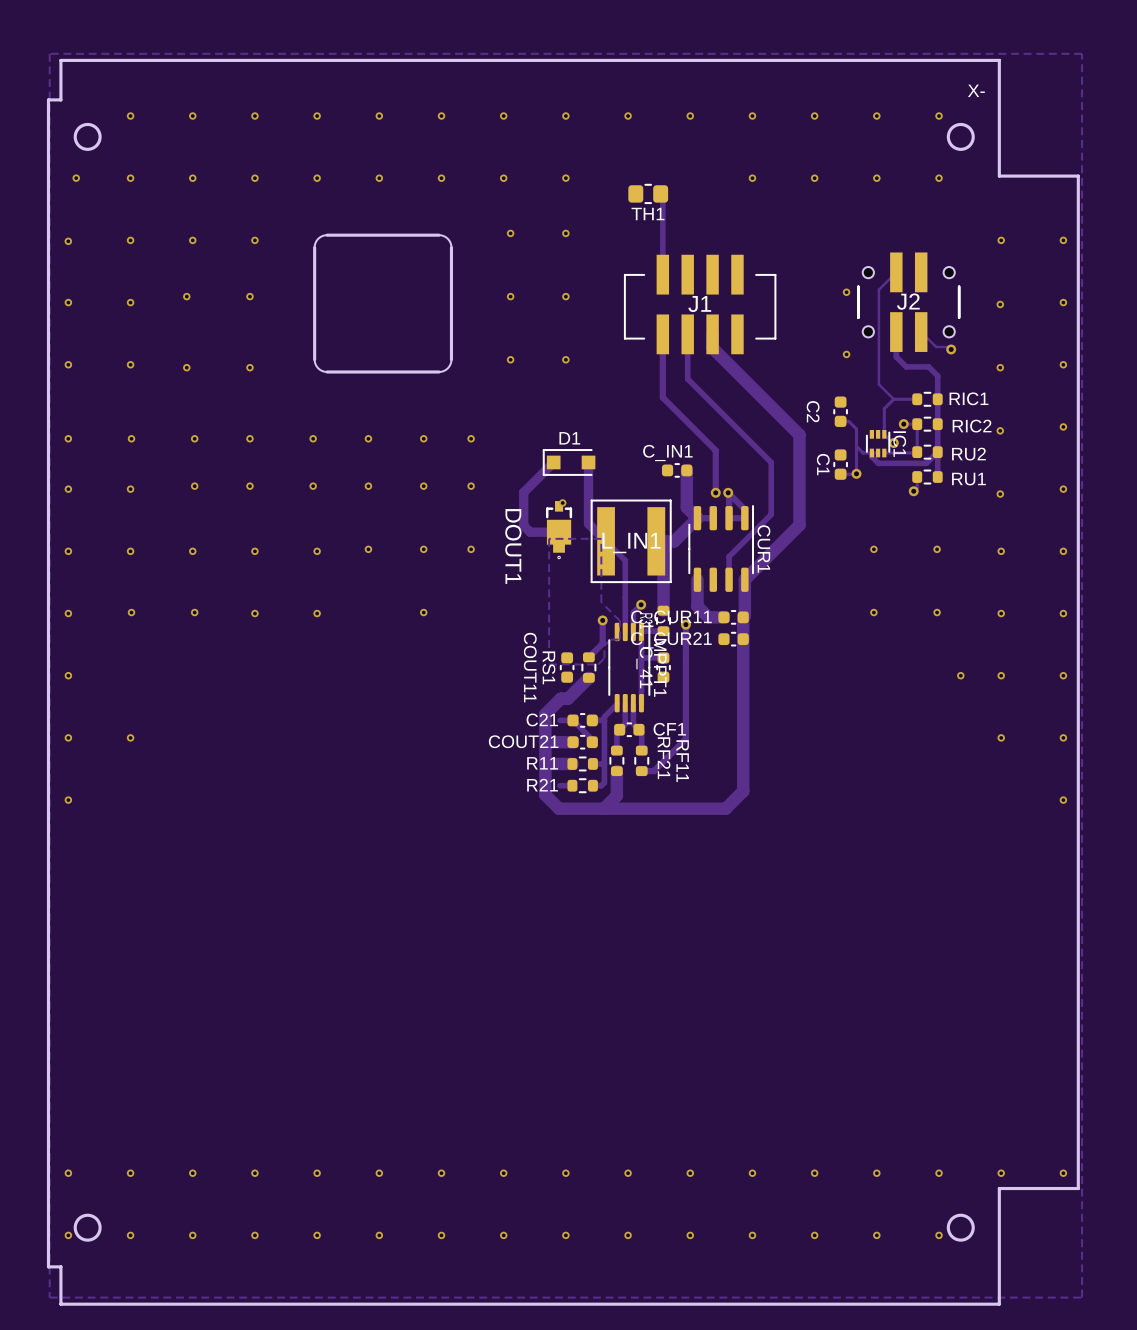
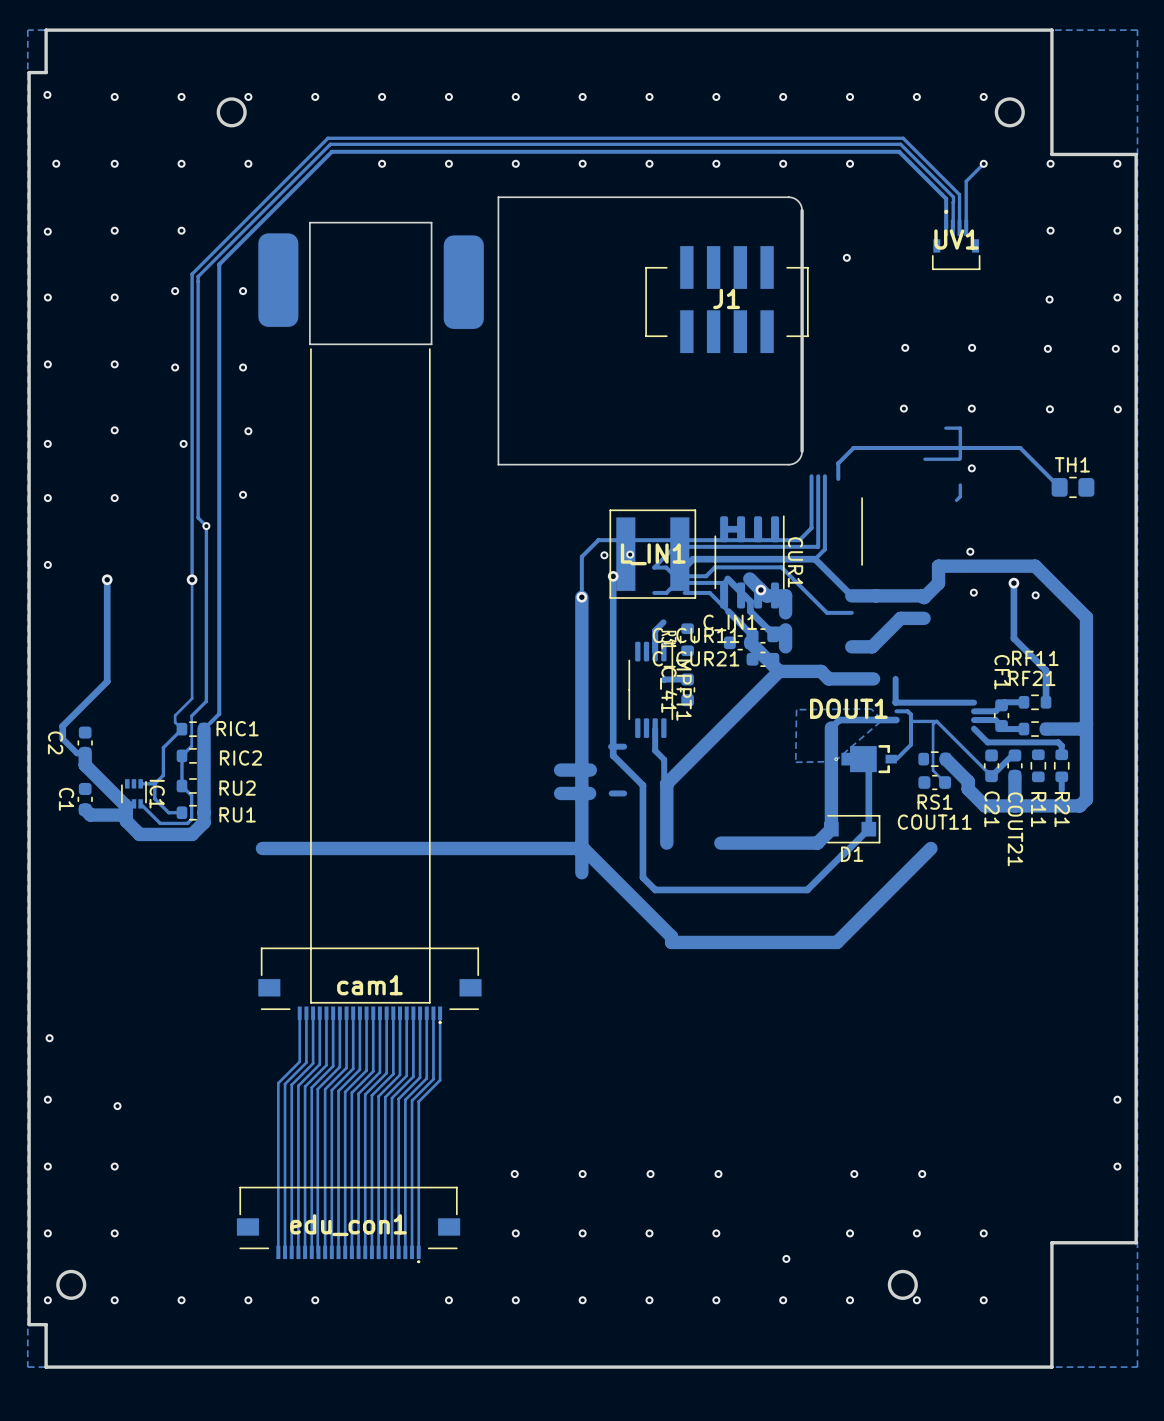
drawing shape: [46, 58, 1080, 1306] -> [27, 28, 1138, 1369]
text: X- (976, 90) -> none
via: none -> (47, 94)
via: (317, 178) -> none
via: none -> (649, 163)
via: none -> (716, 163)
via: (876, 178) -> none
track: none -> (983, 163) (966, 181) (966, 227)
via: none -> (1050, 163)
via: none -> (1117, 163)
TH1 position: (648, 193) -> (1073, 487)
track: (660, 193) (662, 196) (662, 274) -> none
TH1 name position: TH1 (647, 213) -> TH1 (1072, 464)
via: (510, 233) -> none
via: (565, 233) -> none
track: none -> (953, 225) (953, 197) (900, 144) (330, 144) (198, 276) (198, 517) (206, 526) (206, 701) (191, 716) (191, 746) (181, 755) (181, 785) (191, 795) (191, 819) (187, 823) (160, 823) (140, 803)
track: none -> (946, 227) (946, 198) (899, 151) (331, 151) (219, 264) (219, 713) (204, 729) (204, 822) (192, 834) (139, 834) (126, 821) (126, 806) (85, 765) (85, 753) (77, 753) (62, 738) (62, 726) (107, 681) (107, 579)
track: none -> (959, 227) (959, 194) (903, 138) (327, 138) (192, 274) (192, 698) (175, 715) (175, 722) (181, 729) (163, 747) (163, 775) (155, 783)
via: (254, 240) -> none
UV1: none -> (956, 239)
via: none -> (846, 257)
track: (896, 272) (878, 289) (878, 384) (893, 399) -> none
part: none -> (278, 280)
part: none -> (463, 282)
via: (846, 292) -> none
via: (510, 296) -> none
via: (565, 296) -> none
J2: (908, 302) -> none
track: (896, 332) (896, 356) (906, 366) (928, 366) (937, 375) (937, 477) -> none
track: (921, 332) (936, 346) (948, 346) (951, 349) -> none
track: (662, 334) (662, 397) (715, 450) (715, 492) -> none
track: (687, 334) (687, 378) (771, 462) (771, 514) (729, 556) (729, 579) -> none
track: (712, 334) (712, 348) (799, 434) (799, 525) (744, 579) (743, 791) (725, 808) (559, 808) (545, 795) (545, 714) (560, 698) (568, 698) (588, 677) -> none
via: none -> (972, 347)
via: (951, 349) -> none
via position: (846, 354) -> (905, 347)
via: (510, 359) -> none
via: (565, 359) -> none
via position: (1063, 364) -> (1115, 348)
via position: (1000, 367) -> (1047, 348)
track: (893, 399) (884, 408) (884, 434) (893, 443) -> none
track: (917, 399) (893, 399) -> none
RIC1 position: (927, 399) -> (193, 729)
via: none -> (903, 408)
via: none -> (971, 408)
via: none -> (1049, 409)
C2 position: (840, 411) -> (85, 742)
track: (840, 421) (848, 421) (856, 429) (856, 473) (840, 474) -> none
via: (903, 424) -> none
RIC2 position: (927, 424) -> (193, 755)
via position: (1063, 426) -> (1117, 409)
via: (1000, 430) -> none
via position: (131, 438) -> (114, 430)
via position: (249, 438) -> (248, 431)
via: (313, 438) -> none
via: (368, 438) -> none
via: (423, 438) -> none
via: (471, 438) -> none
IC1 position: (878, 443) -> (133, 793)
via: (893, 443) -> none
track: (856, 446) (863, 453) (878, 453) -> none
RU2 position: (927, 452) -> (193, 785)
track: (937, 452) (926, 463) (878, 463) (871, 456) (871, 453) -> none
via: none -> (971, 468)
track: (553, 462) (523, 492) (523, 525) (530, 532) (559, 532) -> none
D1 rotation: 0° (569, 462) -> 180° (852, 829)
D1 position: (569, 462) -> (852, 829)
track: (588, 462) (588, 523) (625, 560) (625, 631) -> none
C1 position: (840, 464) -> (85, 799)
track: none -> (811, 476) (811, 528) (799, 540) (598, 540) (581, 556) (581, 872)
track: none -> (818, 476) (818, 546) (674, 546) (654, 567) (666, 567) (674, 576) (706, 576) (714, 567) (781, 567) (827, 612) (851, 612)
track: none -> (824, 476) (824, 549) (815, 559)
C_IN1 position: (677, 470) -> (740, 642)
track: (686, 470) (686, 507) (697, 518) (674, 541) (656, 541) (663, 548) (663, 610) -> none
track: none -> (838, 478) (838, 463) (853, 447) (1020, 447) (1059, 487)
via: (856, 473) -> none
RU1 position: (927, 477) -> (193, 812)
via: (194, 486) -> none
via: (313, 486) -> none
via: (368, 486) -> none
via: (423, 486) -> none
via: (471, 486) -> none
via: (1063, 489) -> none
via: (913, 491) -> none
via: (715, 492) -> none
track: (728, 492) (744, 509) (744, 518) (729, 518) (729, 493) -> none
via: (728, 492) -> none
via: (1000, 494) -> none
via: (562, 502) -> none
via: none -> (206, 526)
DOUT1 rotation: 0° (559, 530) -> 90° clockwise (865, 759)
DOUT1 position: (559, 530) -> (865, 759)
zone outline: (601, 538) (601, 602) (619, 620) (619, 639) (610, 639) (604, 645) (604, 658) (598, 664) (549, 664) (549, 538) (601, 538) -> none
via: none -> (970, 551)
via: none -> (630, 554)
via: none -> (604, 555)
track: none -> (815, 559) (851, 595) (922, 595) (924, 597) (938, 583) (938, 566) (1035, 566) (1086, 617) (1086, 799) (1079, 805) (984, 805) (968, 789) (968, 781) (945, 759)
track: none -> (815, 559) (693, 559) (684, 567)
via: (368, 549) -> none
via: (423, 549) -> none
via: (471, 549) -> none
via: (873, 549) -> none
via: (937, 549) -> none
via: (130, 551) -> none
via: (192, 551) -> none
via: (254, 551) -> none
via: (317, 551) -> none
via: (1001, 551) -> none
via: (1063, 551) -> none
track: none -> (613, 576) (613, 755) (642, 785) (642, 877) (655, 889) (807, 889) (868, 829) (868, 764) (863, 759)
via: none -> (613, 576)
track: none -> (749, 578) (766, 595) (785, 595) (785, 612)
via: none -> (107, 579)
via: none -> (192, 579)
track: none -> (1013, 583) (1013, 638) (1046, 670) (1046, 702)
via: none -> (1013, 583)
via: none -> (760, 590)
track: none -> (654, 592) (666, 592) (676, 582) (723, 582) (727, 578) (750, 601) (750, 611) (768, 629) (785, 629) (785, 646)
track: none -> (684, 592) (709, 592) (750, 633) (750, 642) (779, 671)
via: none -> (973, 592)
track: (697, 579) (697, 606) (708, 617) (723, 617) -> none
via: none -> (1035, 595)
via: none -> (581, 597)
track: none -> (924, 618) (900, 618) (872, 646) (851, 646)
via: (641, 604) -> none
via: (131, 612) -> none
via: (194, 612) -> none
via: (423, 612) -> none
via: (873, 612) -> none
via: (937, 612) -> none
via: (68, 613) -> none
via: (254, 613) -> none
via: (317, 613) -> none
via: (1001, 613) -> none
via: (1063, 613) -> none
track: (602, 620) (602, 643) (589, 658) -> none
via: (602, 620) -> none
track: (685, 624) (685, 739) (653, 771) (641, 771) -> none
via: (685, 624) -> none
track: (641, 631) (641, 704) -> none
track: (663, 631) (641, 631) -> none
track: none -> (779, 671) (821, 671) (828, 678) (873, 678)
track: none -> (779, 671) (666, 783) (666, 843)
track: none -> (895, 678) (895, 702)
COUT11 name position: COUT11 (530, 667) -> COUT11 (934, 822)
RS1 name position: RS1 (548, 667) -> RS1 (935, 802)
COUT11 rotation: 0° (567, 667) -> 90° clockwise (934, 782)
COUT11 position: (567, 667) -> (934, 782)
RS1 rotation: 0° (588, 667) -> 90° clockwise (934, 759)
RS1 position: (588, 667) -> (934, 759)
via: (68, 675) -> none
via: (960, 675) -> none
via: (1001, 675) -> none
via: (1063, 675) -> none
track: none -> (974, 702) (895, 702)
track: none -> (1023, 702) (1004, 702) (995, 711) (974, 711)
zone outline: none -> (871, 708) (881, 719) (880, 721) (834, 761) (795, 762) (796, 709) (871, 708)
track: none -> (896, 711) (907, 711) (911, 714) (911, 744) (896, 759)
track: none -> (896, 720) (839, 720) (831, 727) (831, 829) (817, 843) (720, 843)
track: none -> (974, 720) (995, 720) (1004, 729) (1023, 729)
track: none -> (911, 721) (936, 721) (991, 776) (1012, 755) (1014, 755)
track: none -> (936, 721) (933, 724) (933, 770) (945, 782)
track: none -> (1086, 724) (1081, 729) (1046, 729)
track: none -> (974, 728) (987, 742) (1058, 742) (1061, 745) (1061, 754)
track: (617, 704) (604, 716) (604, 782) (601, 785) (592, 785) -> none
track: (625, 704) (625, 724) (616, 732) (616, 750) -> none
C21 name position: C21 (542, 719) -> C21 (992, 809)
track: (559, 720) (573, 720) (592, 739) (592, 742) -> none
C21 rotation: 0° (582, 720) -> 90° clockwise (991, 765)
C21 position: (582, 720) -> (991, 765)
CF1 rotation: 0° (629, 729) -> 90° clockwise (1001, 715)
CF1 position: (629, 729) -> (1001, 715)
CF1 name position: CF1 (669, 729) -> CF1 (1002, 672)
via: (68, 737) -> none
via: (130, 737) -> none
via: (1001, 737) -> none
via: (1063, 737) -> none
COUT21 name position: COUT21 (523, 741) -> COUT21 (1015, 829)
COUT21 rotation: 0° (582, 742) -> 90° clockwise (1014, 765)
COUT21 position: (582, 742) -> (1014, 765)
track: none -> (1014, 776) (1014, 805)
track: none -> (1061, 776) (1061, 790)
track: none -> (140, 783) (154, 783) (154, 798) (168, 812) (181, 812)
RF21 name position: RF21 (664, 758) -> RF21 (1032, 678)
RF21 rotation: 0° (616, 760) -> 90° clockwise (1035, 729)
RF21 position: (616, 760) -> (1035, 729)
RF11 rotation: 0° (641, 760) -> 90° clockwise (1035, 702)
RF11 position: (641, 760) -> (1035, 702)
RF11 name position: RF11 (682, 761) -> RF11 (1035, 658)
R11 name position: R11 (542, 763) -> R11 (1038, 809)
R11 rotation: 0° (582, 763) -> 90° clockwise (1038, 765)
R11 position: (582, 763) -> (1038, 765)
track: (616, 771) (616, 795) (603, 808) -> none
track: none -> (85, 809) (90, 815) (126, 815)
R21 name position: R21 (542, 785) -> R21 (1062, 809)
track: (572, 785) (559, 785) -> none
R21 rotation: 0° (582, 785) -> 90° clockwise (1061, 765)
R21 position: (582, 785) -> (1061, 765)
via: (68, 800) -> none
via: (1063, 800) -> none
track: none -> (930, 848) (836, 942) (671, 942) (671, 936) (583, 848) (262, 848)
cam1: none -> (369, 985)
track: none -> (299, 1013) (299, 1061) (278, 1083) (278, 1252)
track: none -> (306, 1013) (306, 1062) (285, 1084) (285, 1252)
track: none -> (313, 1013) (313, 1063) (291, 1084) (291, 1252)
track: none -> (319, 1013) (319, 1064) (298, 1085) (298, 1252)
track: none -> (326, 1013) (326, 1065) (305, 1086) (305, 1252)
track: none -> (333, 1013) (333, 1066) (311, 1087) (311, 1252)
track: none -> (339, 1013) (339, 1067) (317, 1089) (317, 1252)
track: none -> (346, 1013) (346, 1067) (325, 1089) (325, 1252)
track: none -> (353, 1013) (353, 1068) (331, 1090) (331, 1252)
track: none -> (359, 1013) (359, 1069) (338, 1091) (338, 1252)
track: none -> (366, 1013) (366, 1070) (345, 1091) (345, 1252)
track: none -> (373, 1013) (373, 1071) (351, 1092) (351, 1252)
track: none -> (379, 1013) (379, 1072) (358, 1093) (358, 1252)
track: none -> (386, 1013) (386, 1073) (365, 1094) (365, 1252)
track: none -> (393, 1013) (393, 1074) (371, 1095) (371, 1252)
track: none -> (400, 1013) (400, 1074) (378, 1096) (378, 1252)
track: none -> (406, 1013) (406, 1075) (385, 1097) (385, 1252)
track: none -> (413, 1013) (413, 1076) (391, 1098) (391, 1252)
track: none -> (420, 1013) (420, 1077) (398, 1098) (398, 1252)
track: none -> (426, 1013) (426, 1078) (405, 1099) (405, 1252)
track: none -> (433, 1013) (433, 1079) (412, 1100) (412, 1252)
track: none -> (440, 1013) (440, 1080) (418, 1101) (418, 1252)
via: none -> (49, 1038)
via: none -> (47, 1099)
via: none -> (1117, 1099)
via: none -> (117, 1106)
via: none -> (47, 1166)
via: none -> (114, 1166)
via: none -> (1117, 1166)
via: none -> (514, 1174)
via: none -> (582, 1174)
via: none -> (650, 1174)
via: none -> (718, 1174)
via: none -> (854, 1174)
via: none -> (922, 1174)
edu_con1: none -> (348, 1224)
via: (192, 1173) -> none
via: (254, 1173) -> none
via: (317, 1173) -> none
via: (379, 1173) -> none
via: (441, 1173) -> none
via position: (752, 1173) -> (786, 1258)
via: (1001, 1173) -> none
via: (1063, 1173) -> none
via: (379, 1235) -> none

